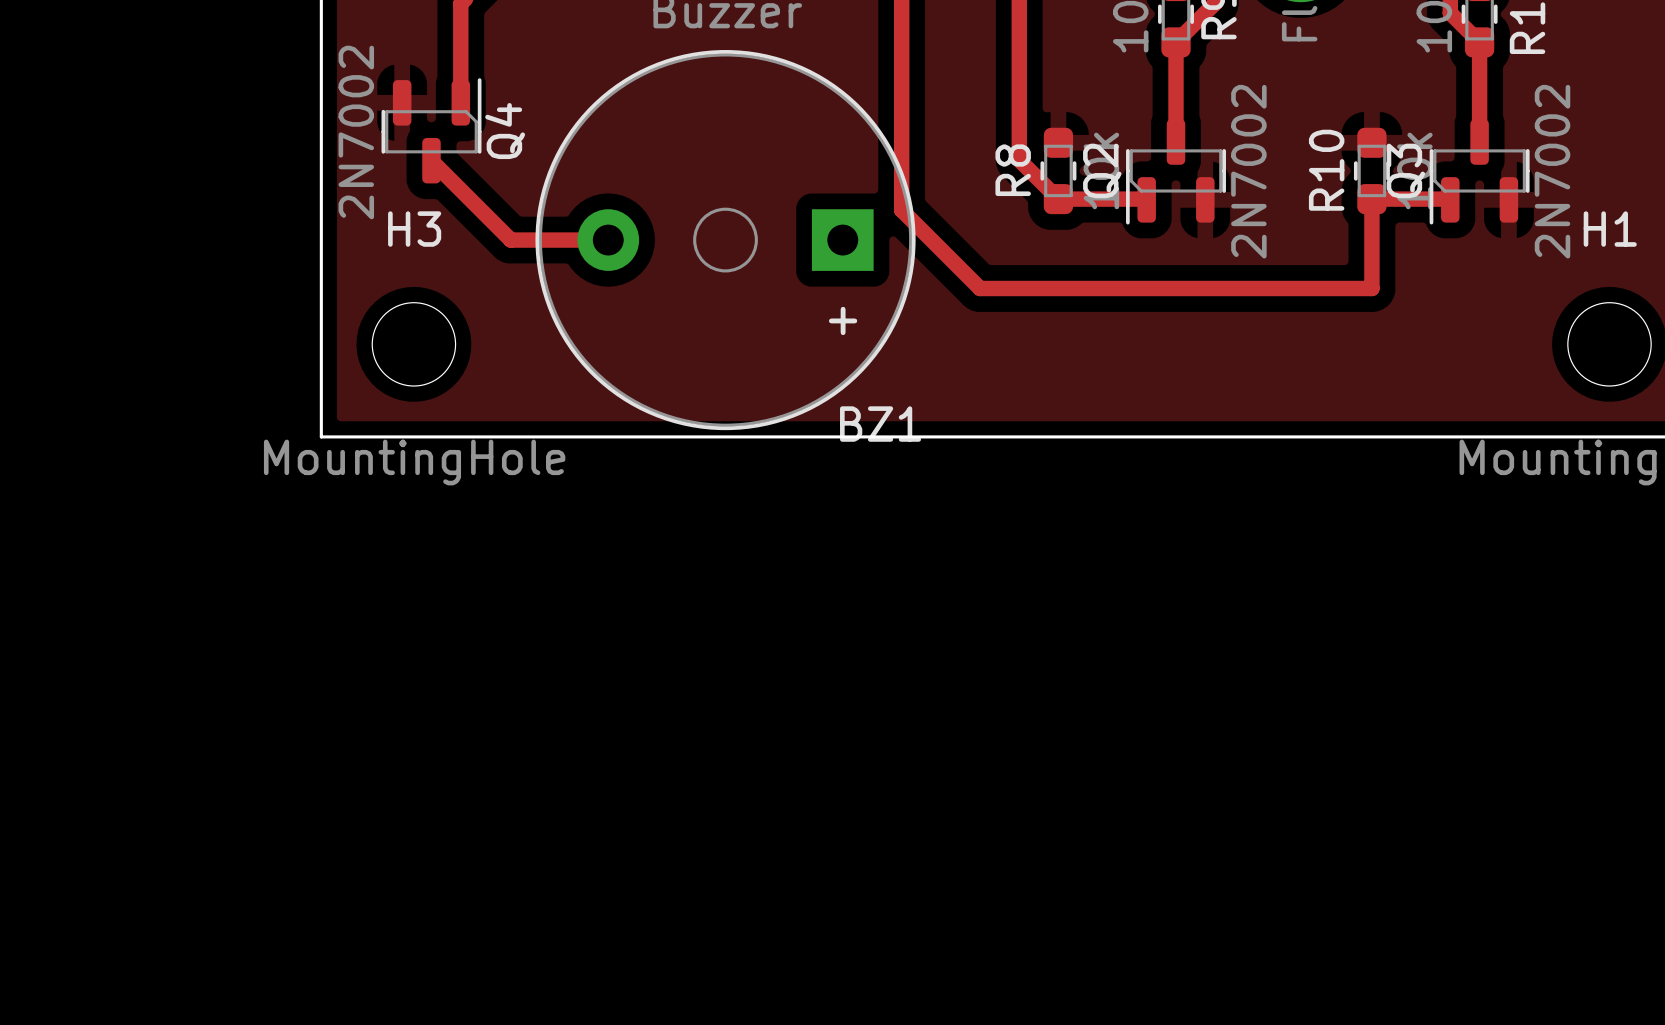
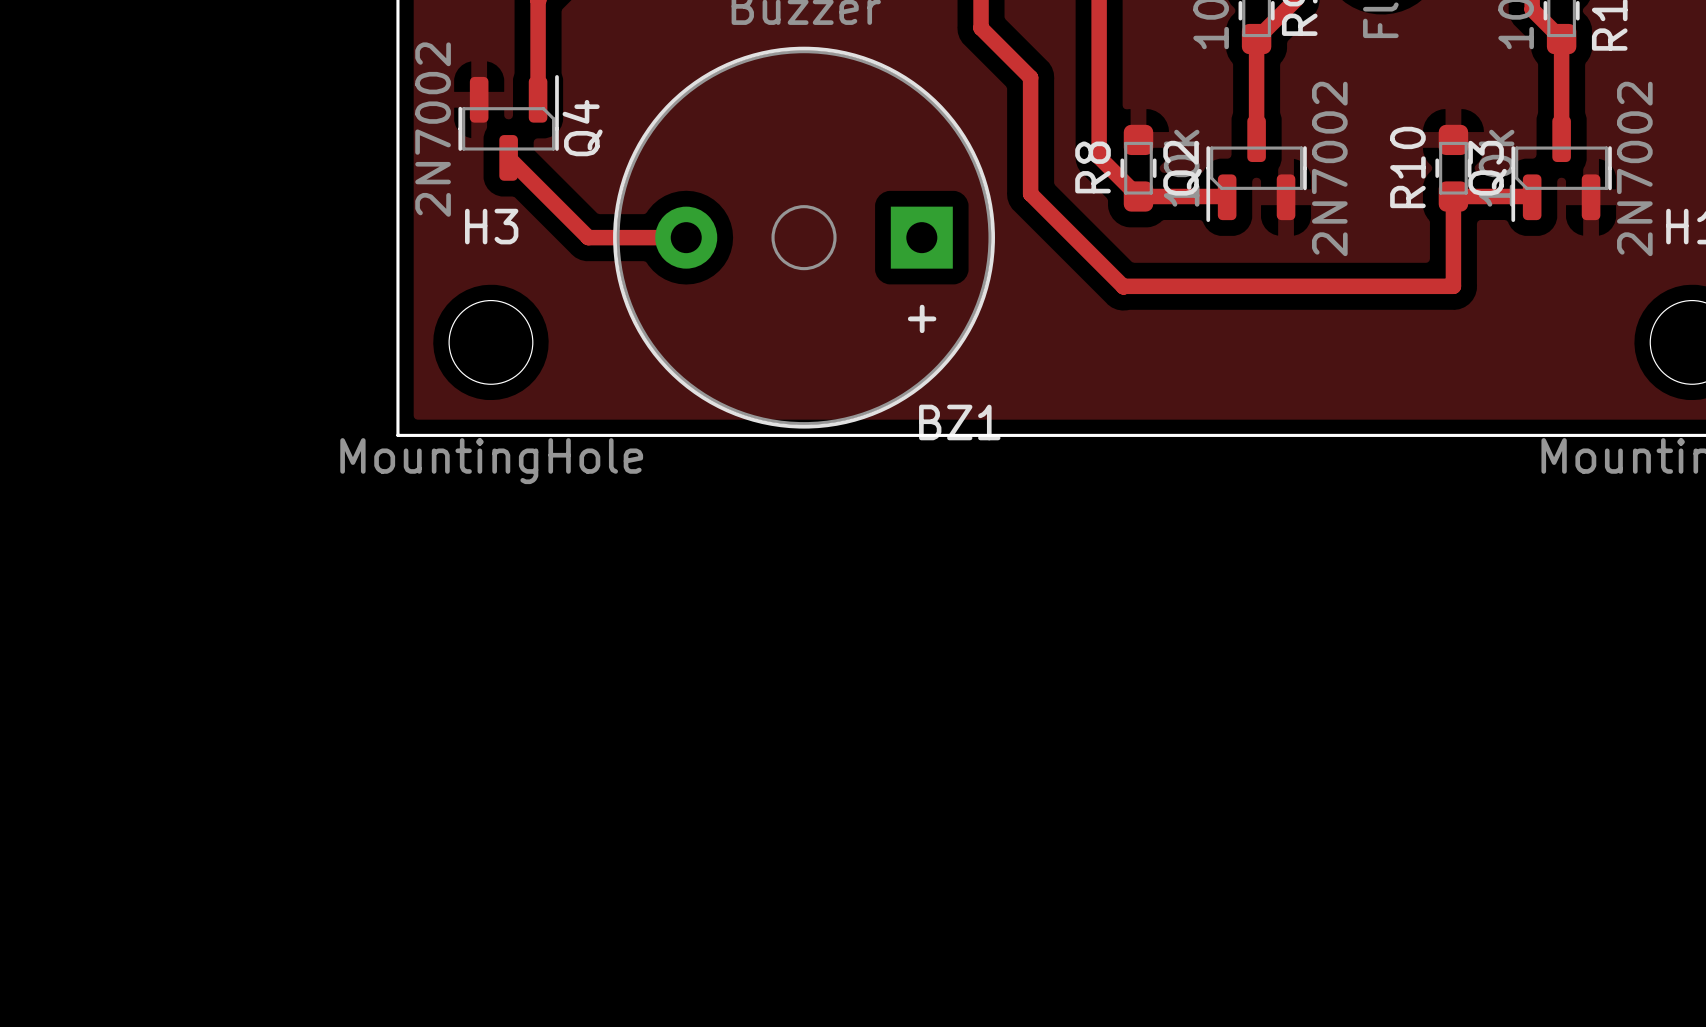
track: (901, 31) (901, 210) (980, 288) (1044, 288) -> (981, 28) (1030, 77) (1030, 193) (1124, 286)

